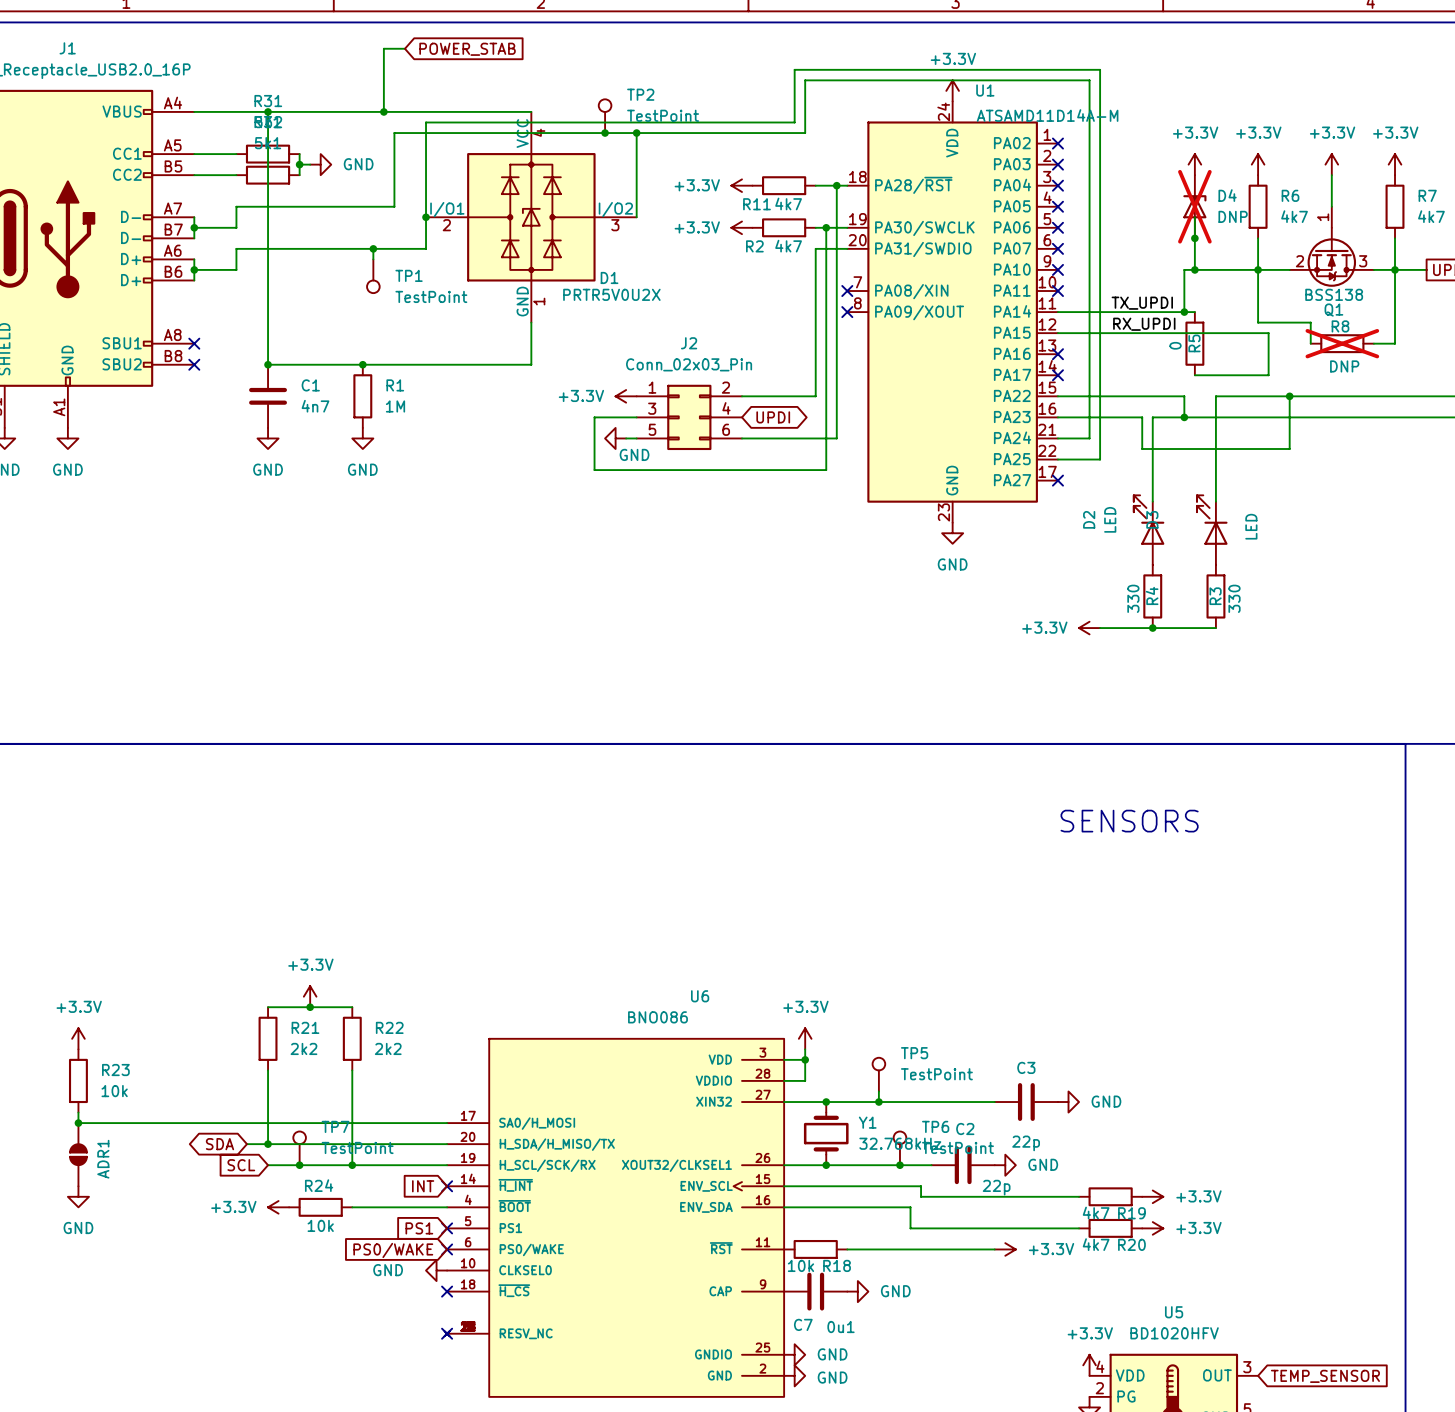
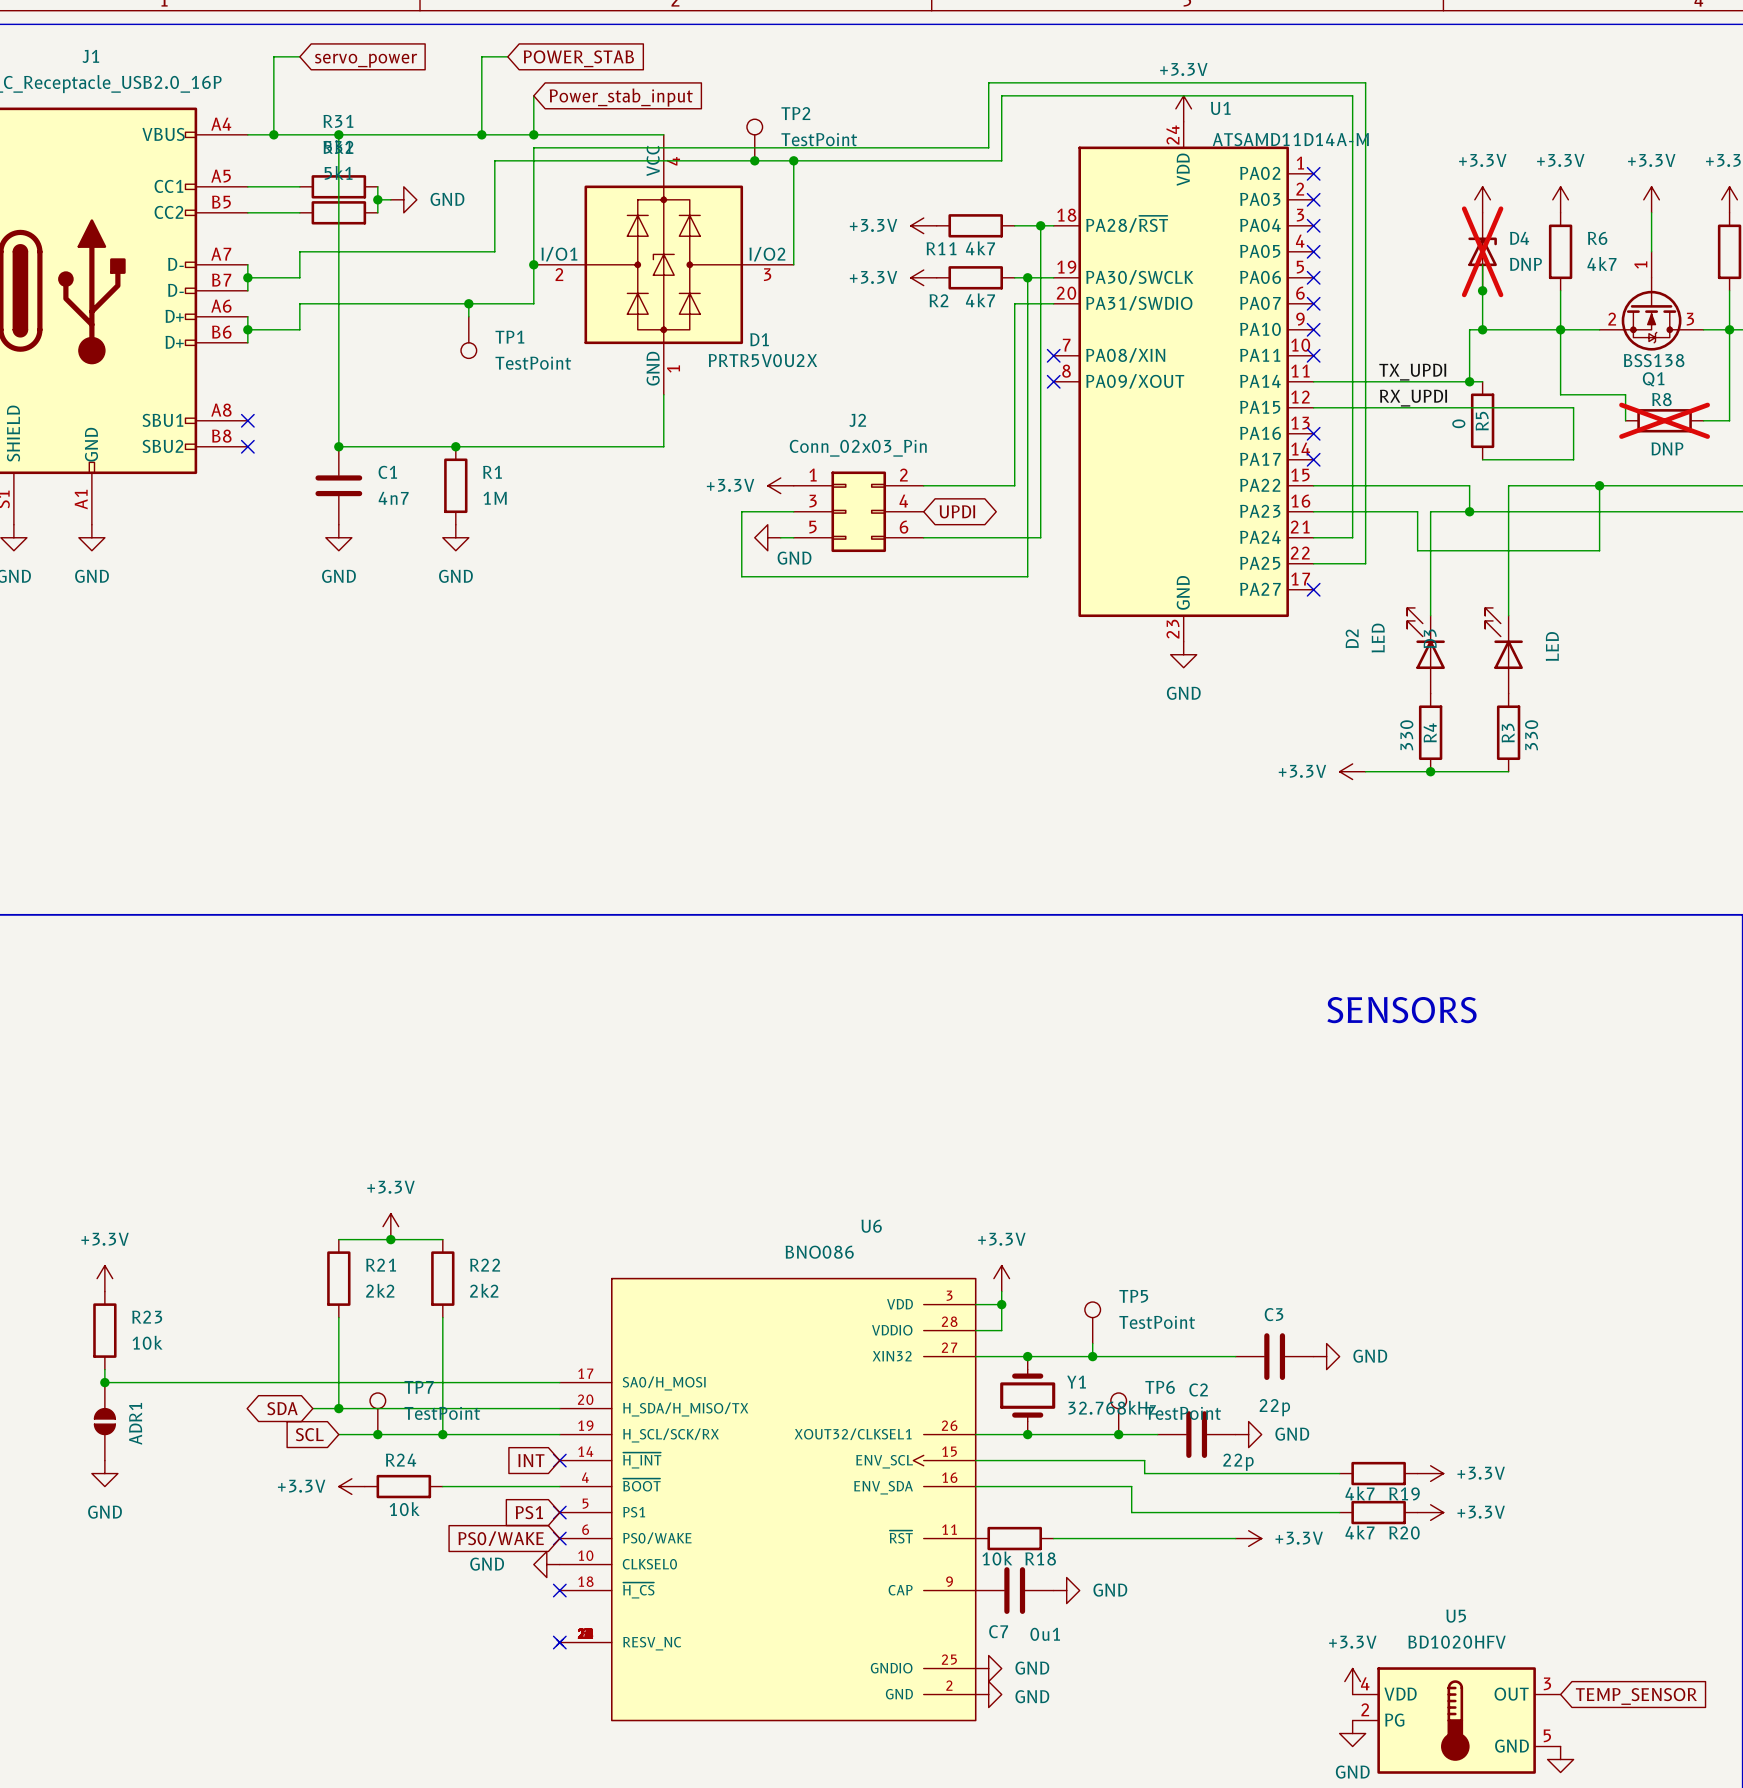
wire: none -> (299, 56) (273, 56) (273, 134)
global label: none -> servo_power (366, 60)
wire: none -> (533, 95) (533, 134)
global label: none -> Power_stab_input (621, 97)
junction: none -> (273, 134)
junction: none -> (533, 134)

